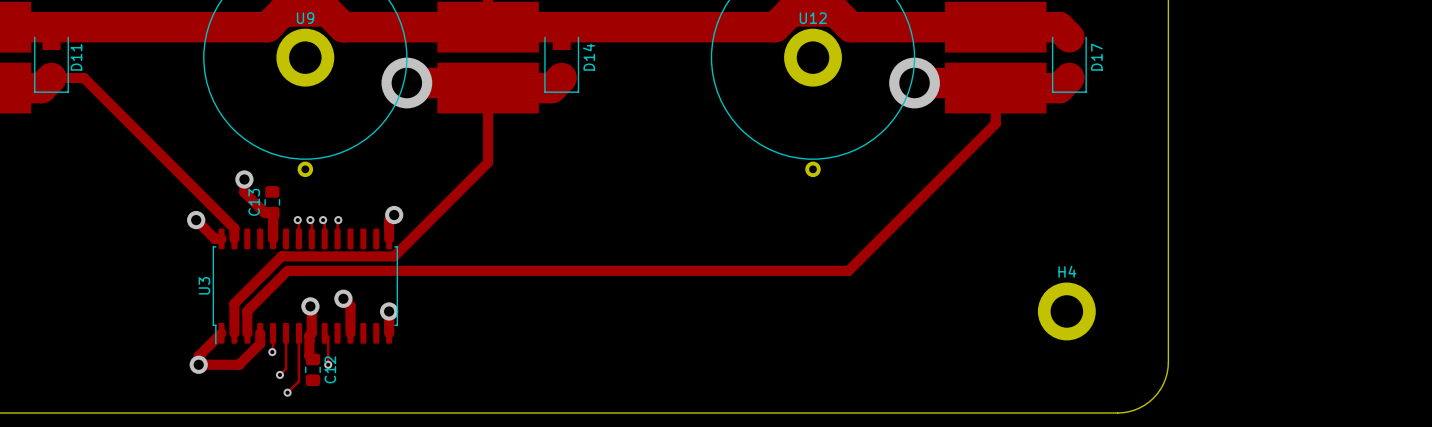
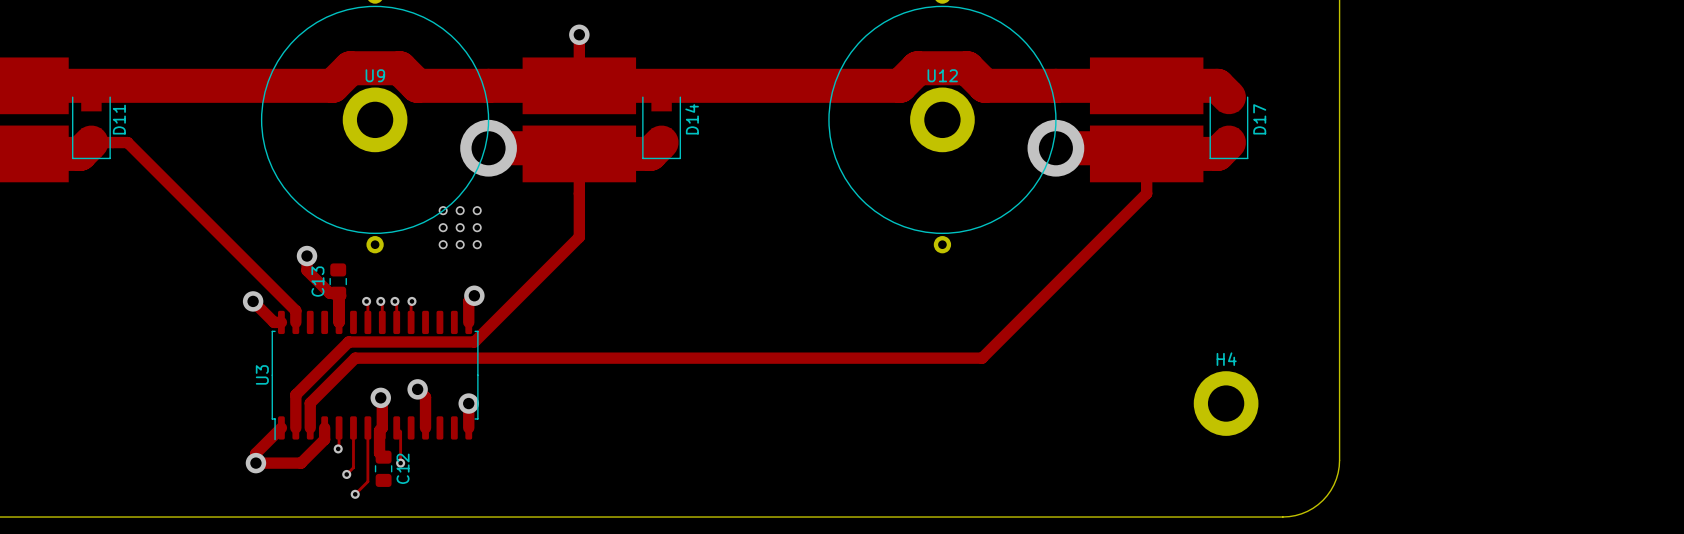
via: none -> (443, 210)
via: none -> (460, 210)
via: none -> (477, 210)
via: none -> (443, 227)
via: none -> (460, 227)
via: none -> (477, 227)
via: none -> (443, 244)
via: none -> (460, 244)
via: none -> (477, 244)

